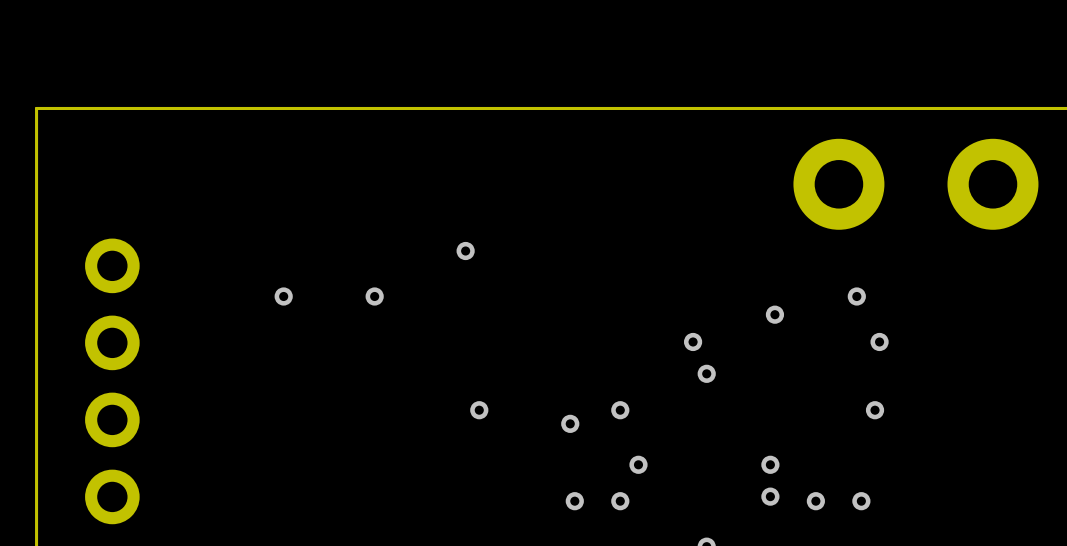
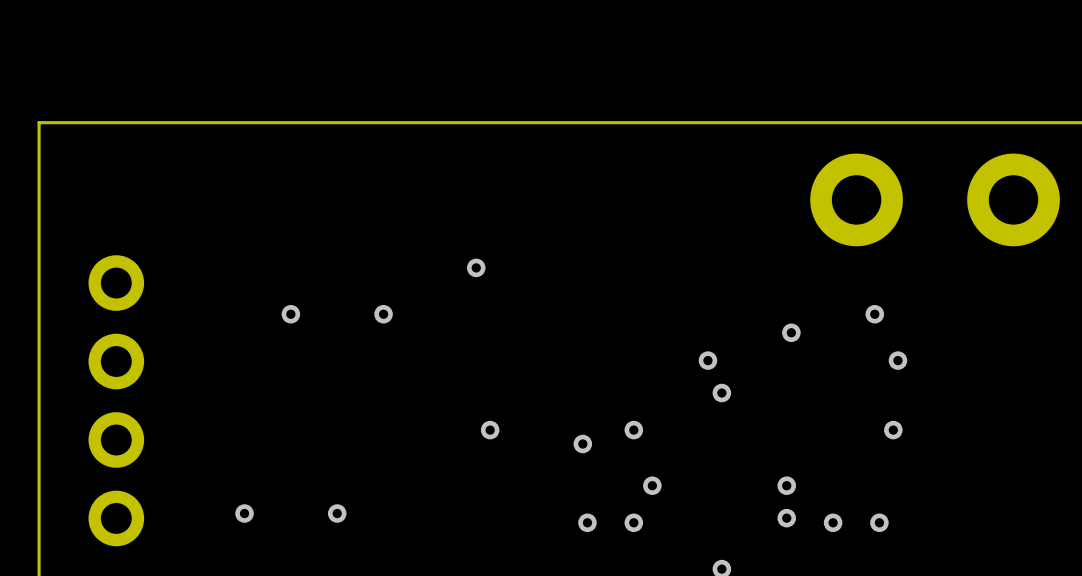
via: none -> (244, 513)
via: none -> (337, 513)

